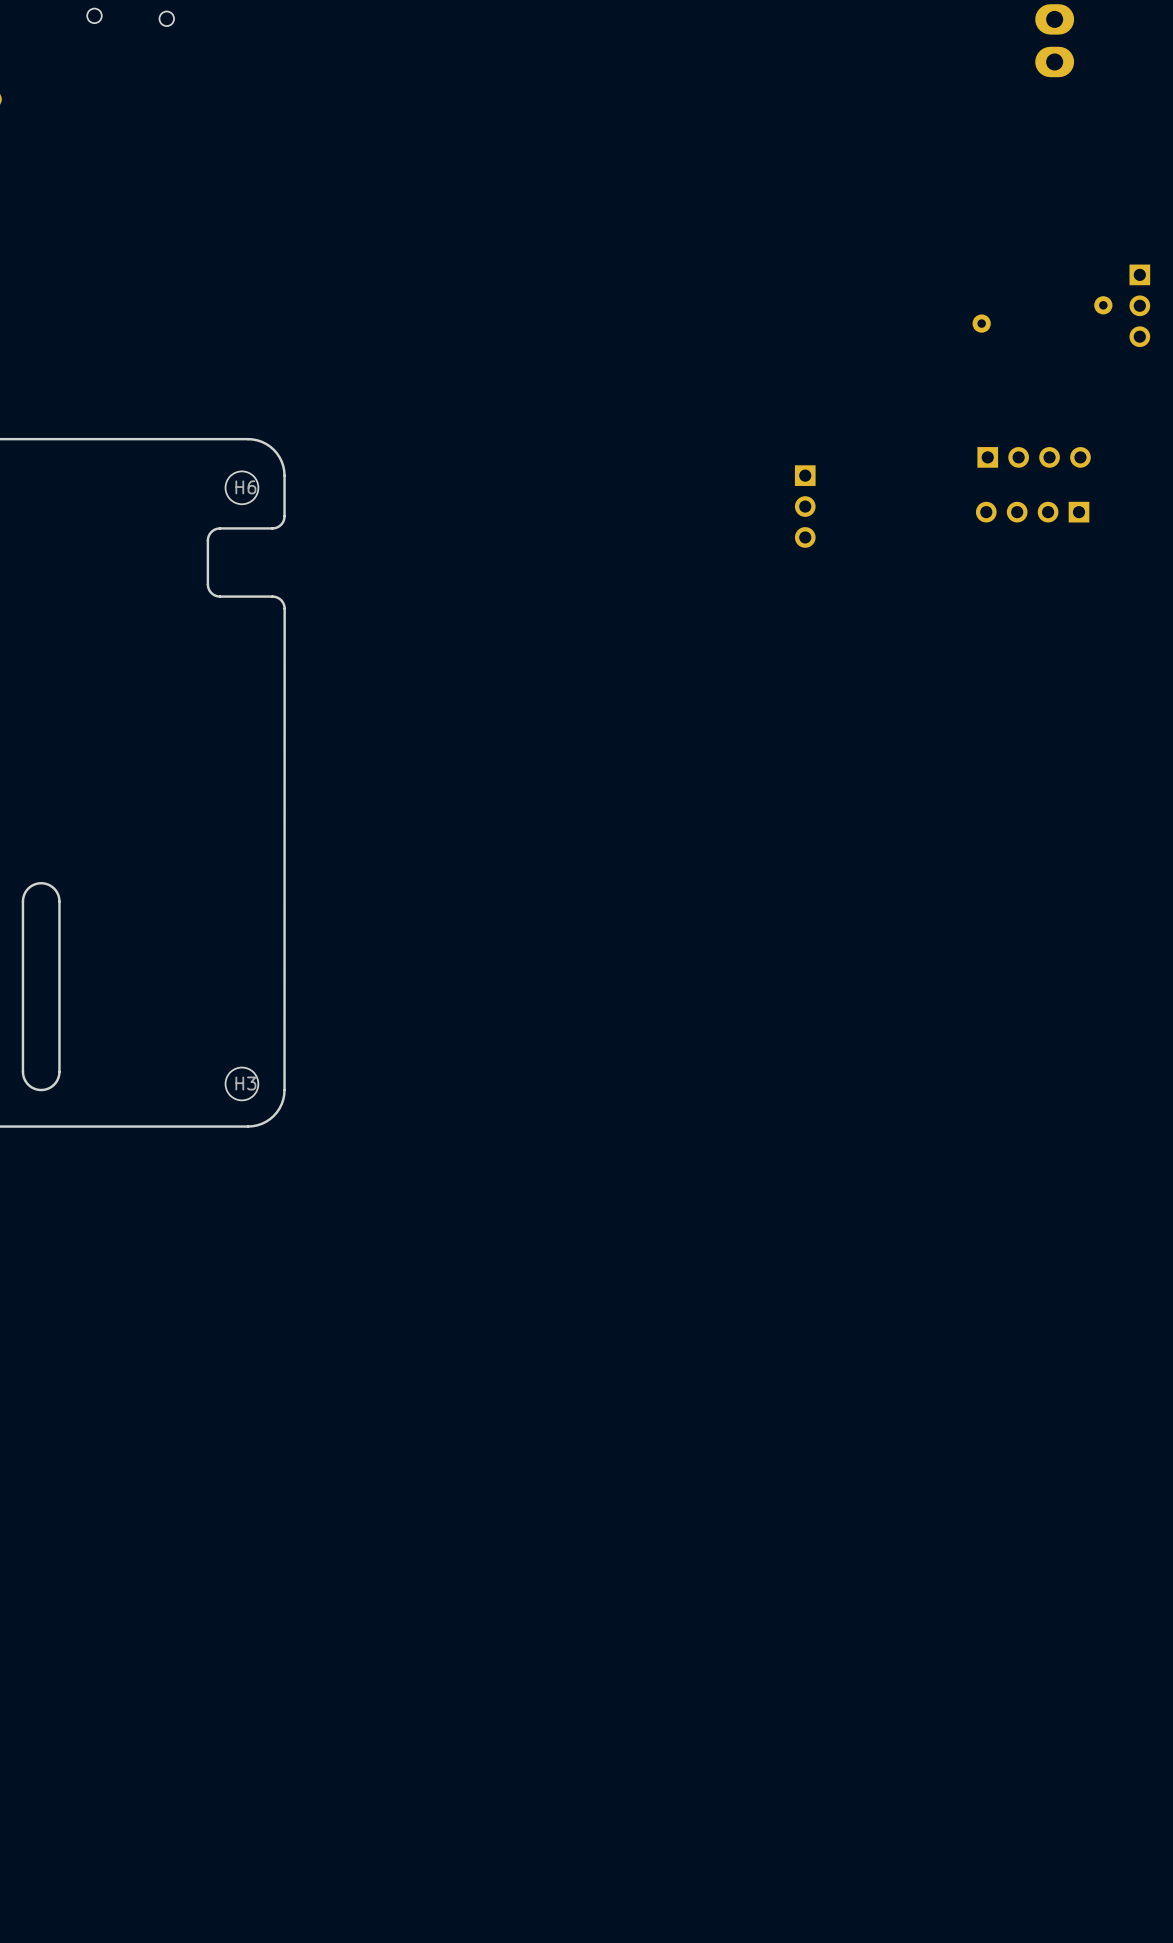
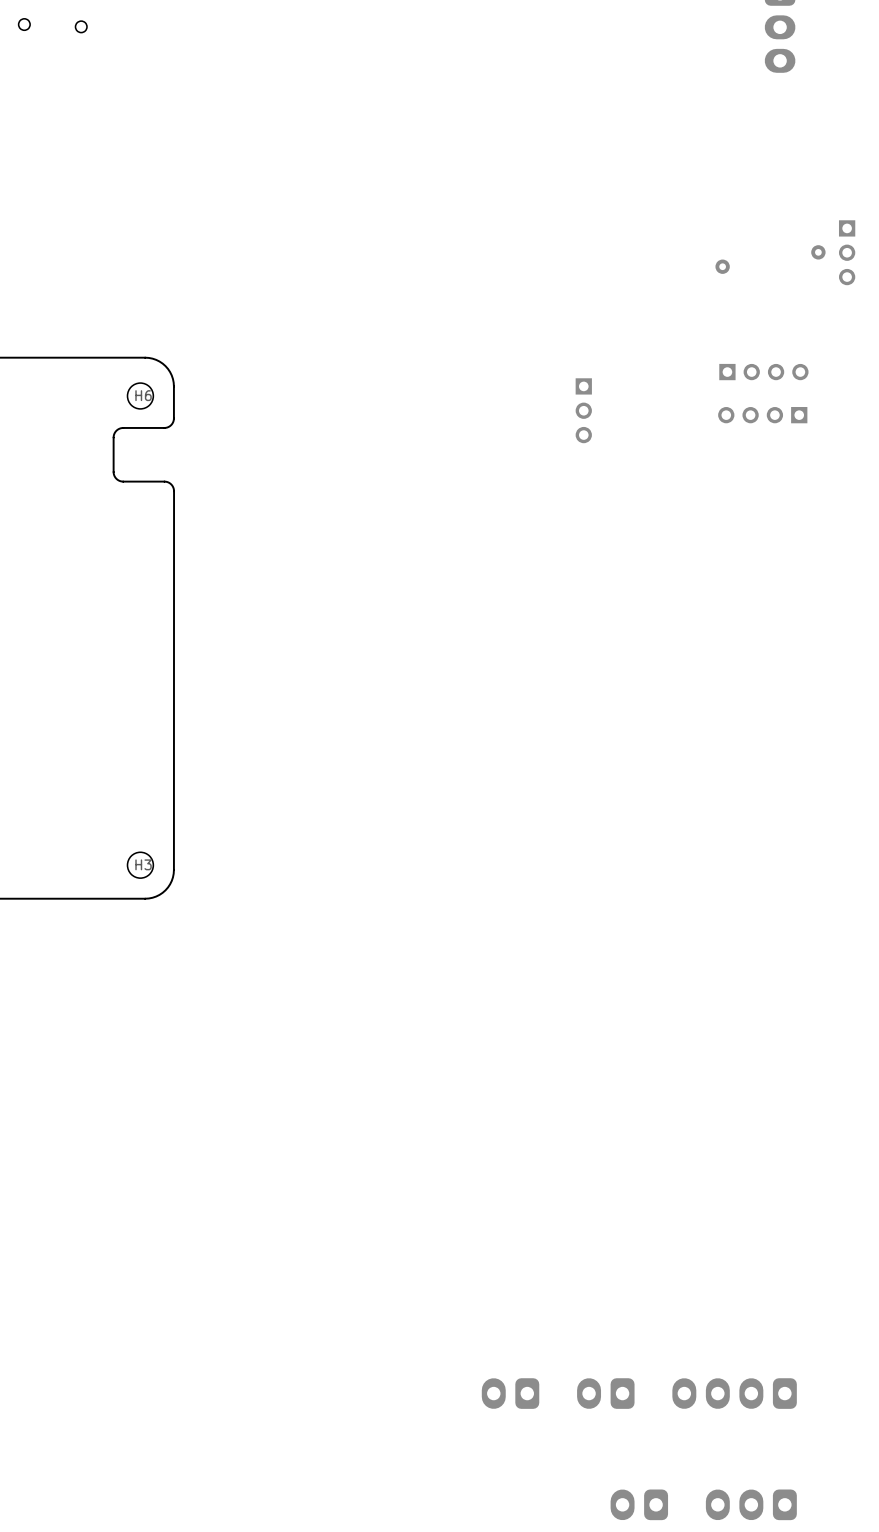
part: none -> (510, 1393)
part: none -> (605, 1393)
part: none -> (734, 1393)
part: none -> (639, 1504)
part: none -> (751, 1504)

